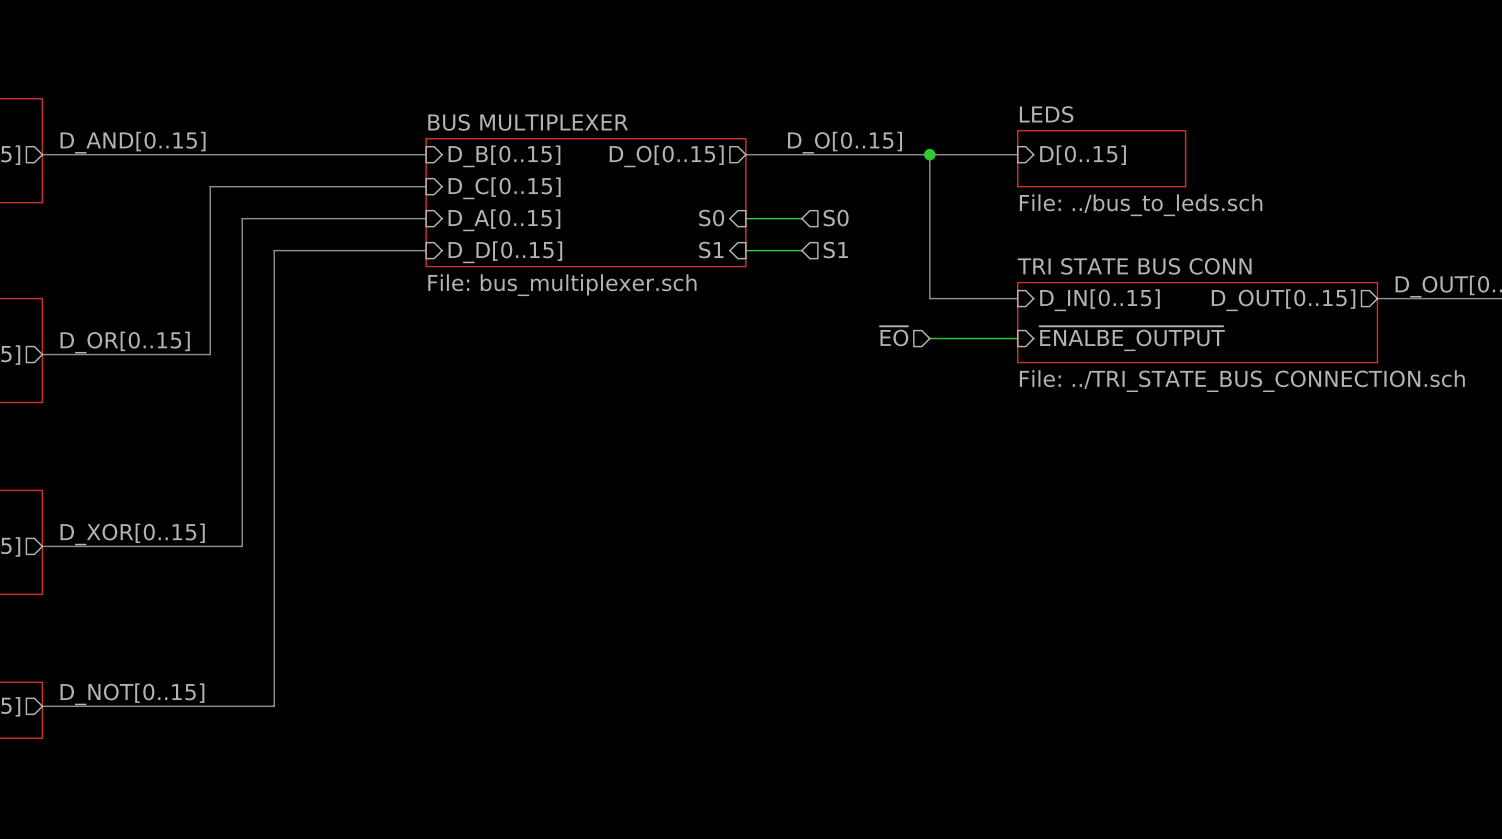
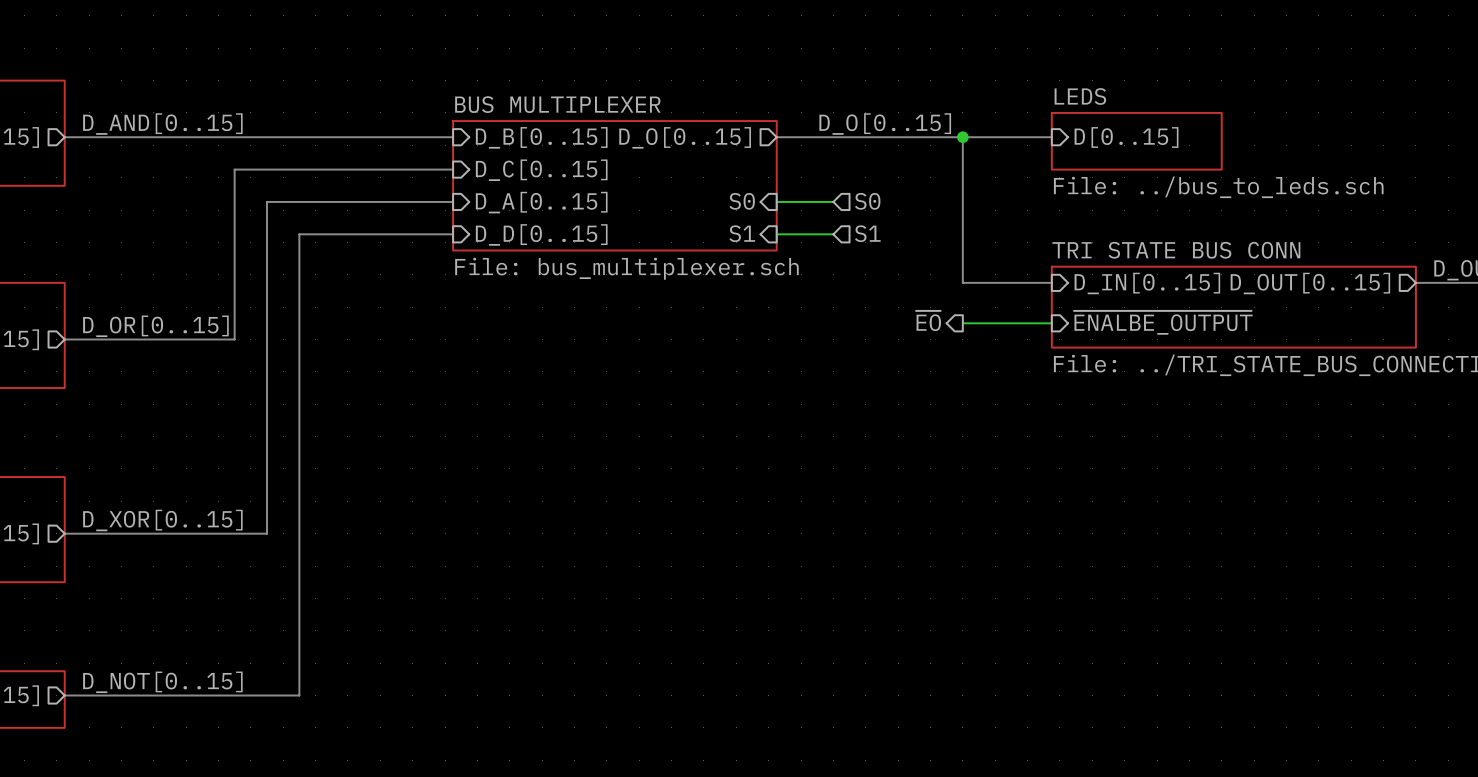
hierarchical label shape: input (894, 336) -> output (928, 320)

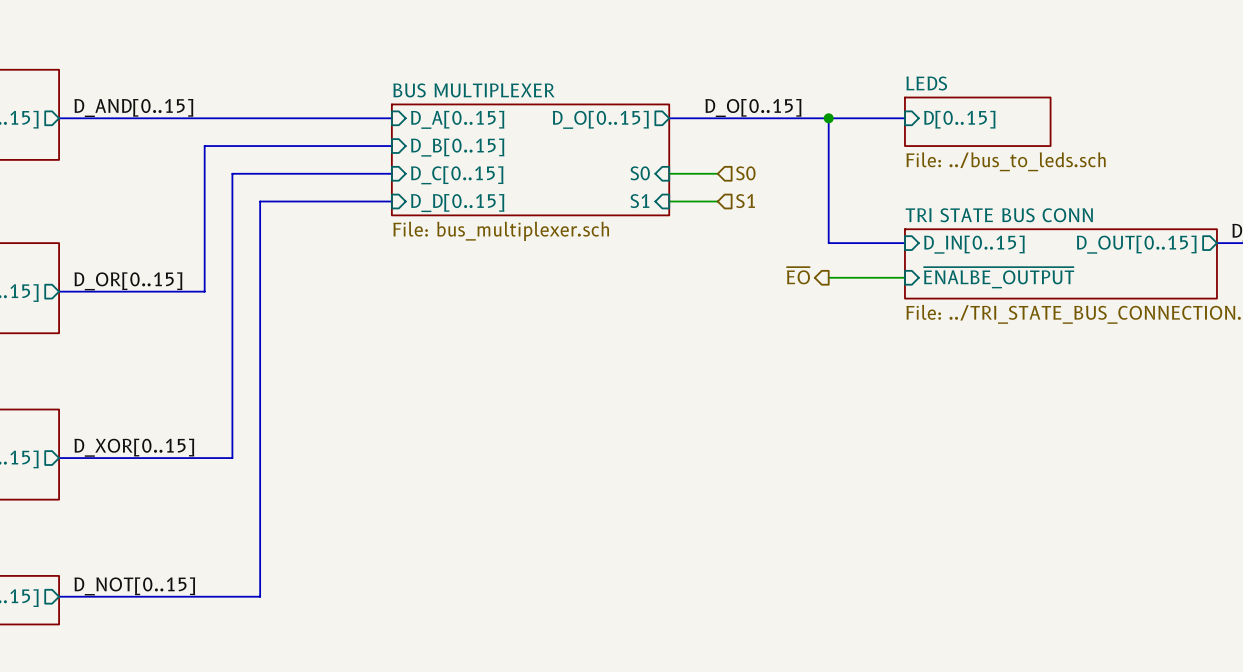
sheet pin: D_B[0..15] (541, 137) -> D_A[0..15] (457, 119)
sheet pin: D_C[0..15] (541, 170) -> D_B[0..15] (457, 147)
sheet pin: D_A[0..15] (541, 202) -> D_C[0..15] (457, 175)

